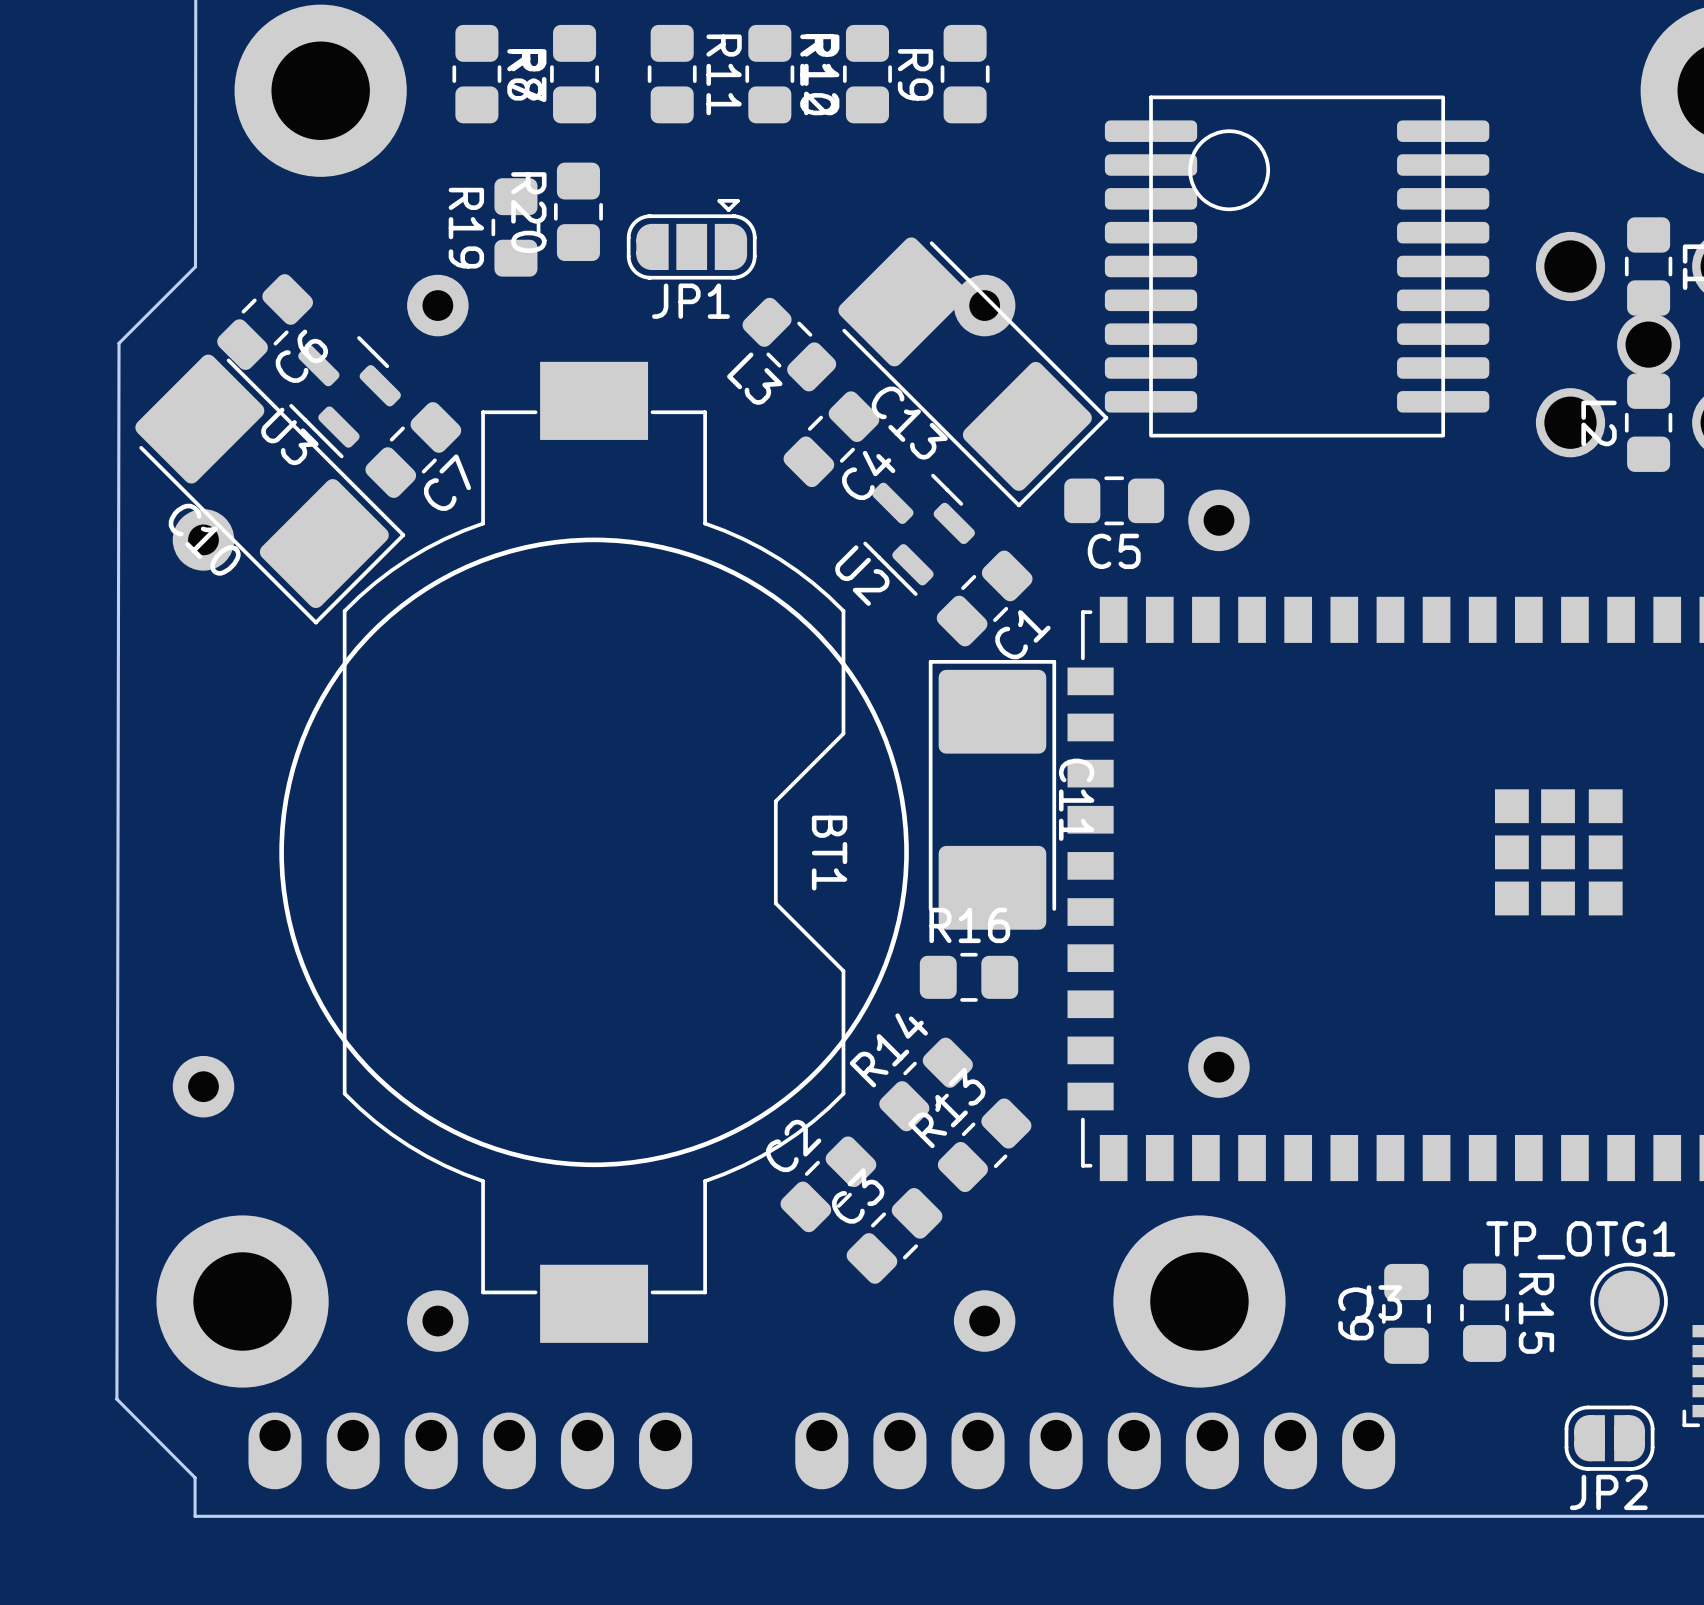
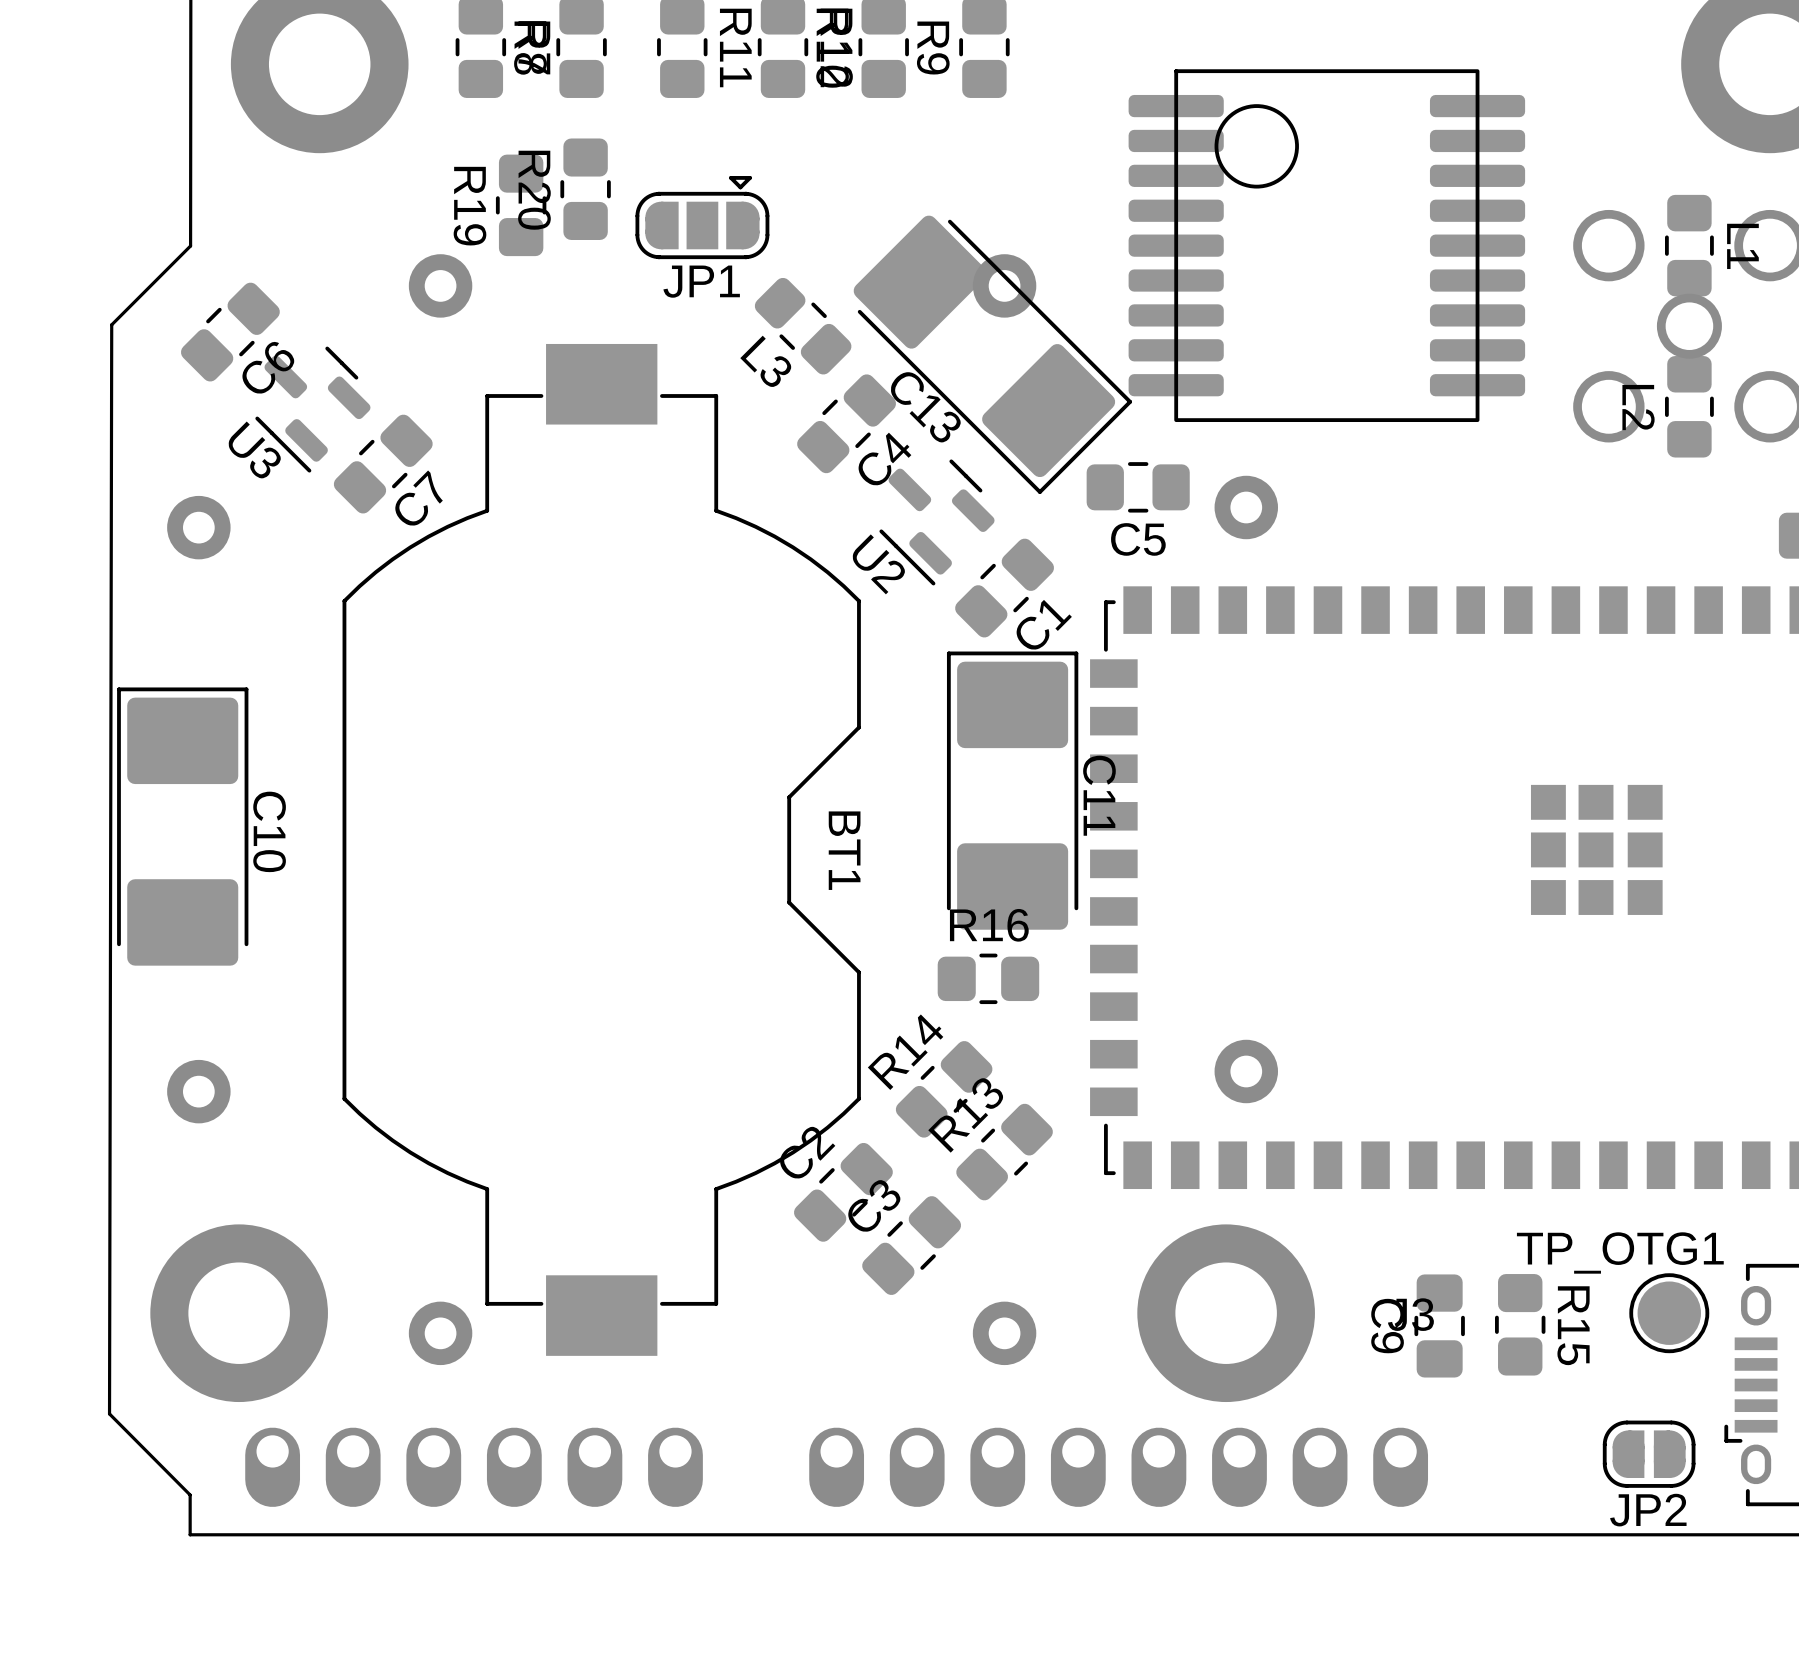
C6 position: (265, 322) -> (230, 332)
U3 position: (345, 397) -> (312, 409)
C7 position: (413, 450) -> (383, 464)
C10 rotation: 0° (270, 489) -> 135° counterclockwise (182, 826)
C10 position: (270, 489) -> (182, 826)
drawing: [279, 537, 909, 1168] -> none

